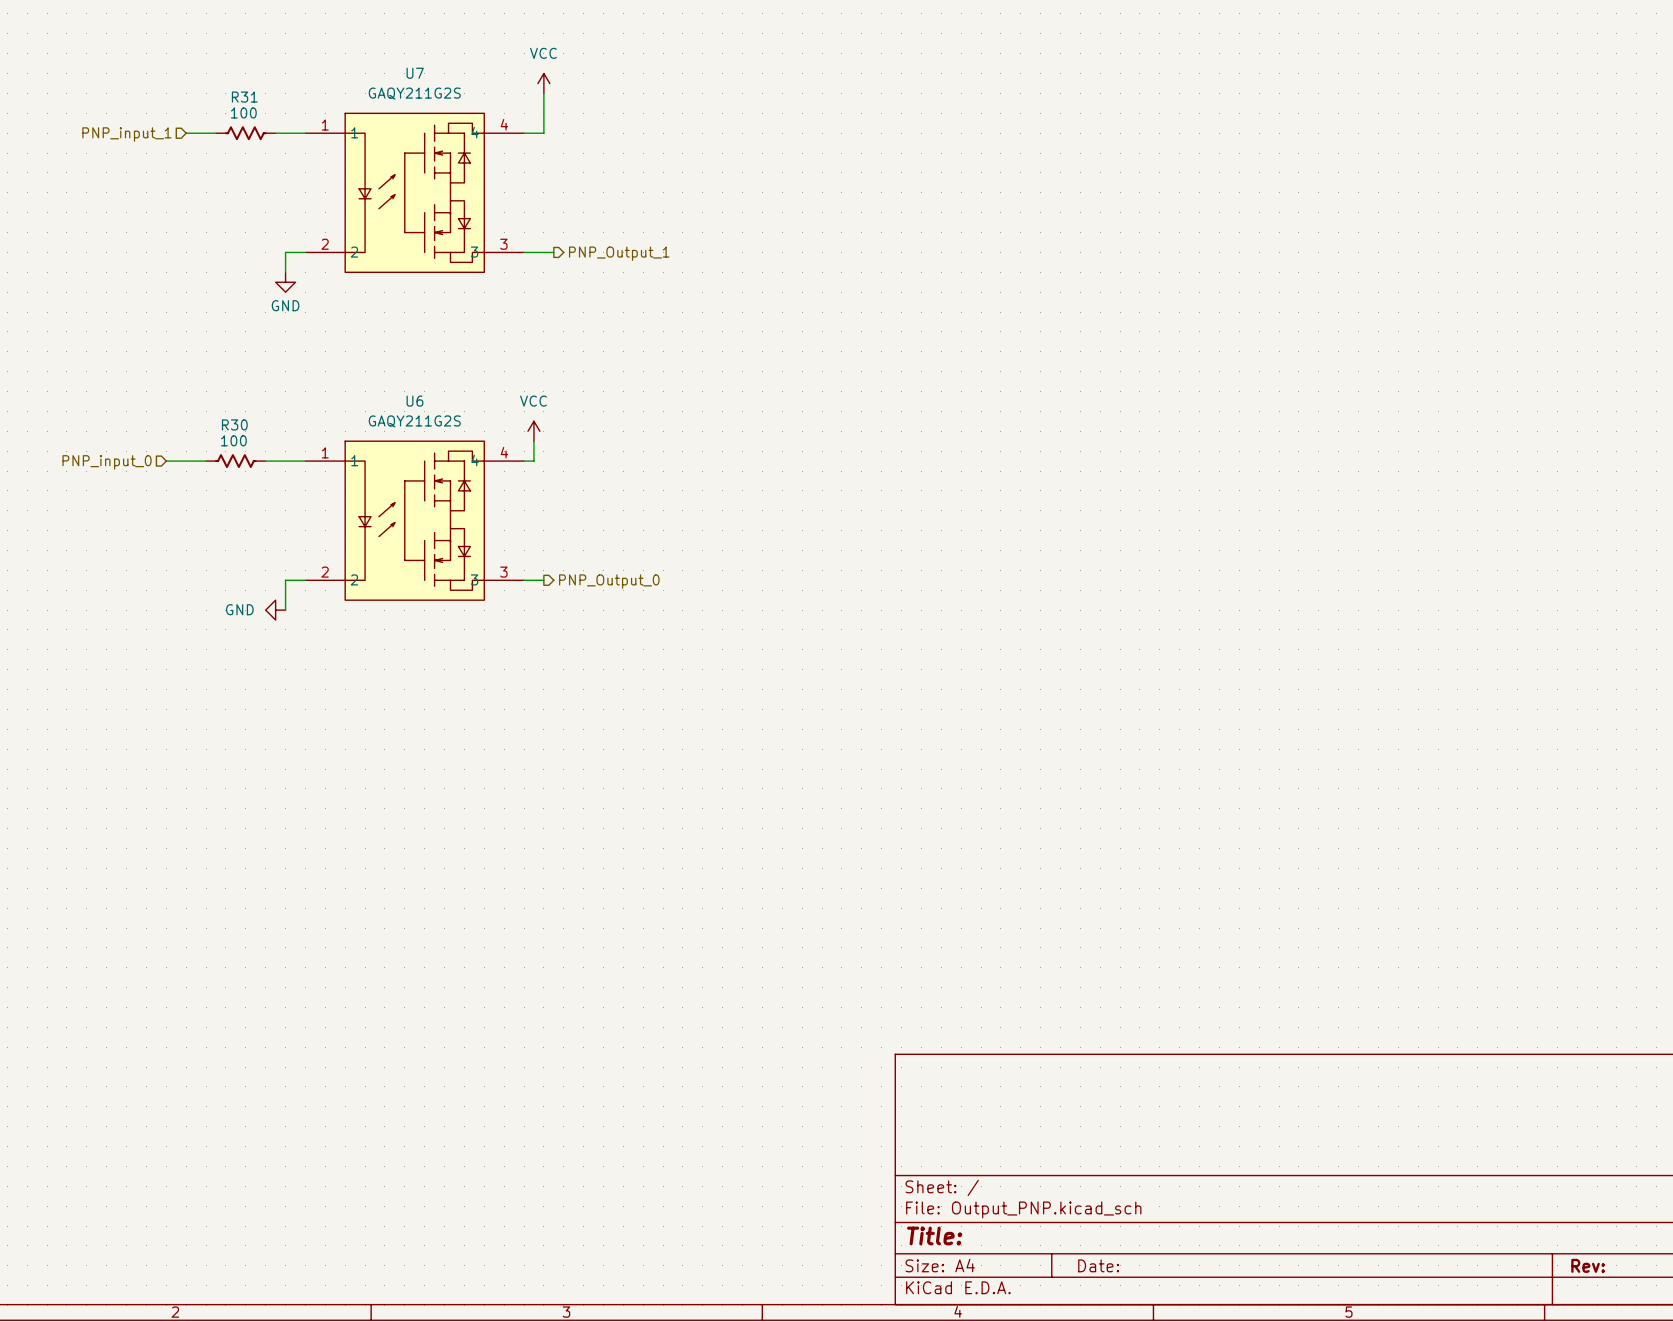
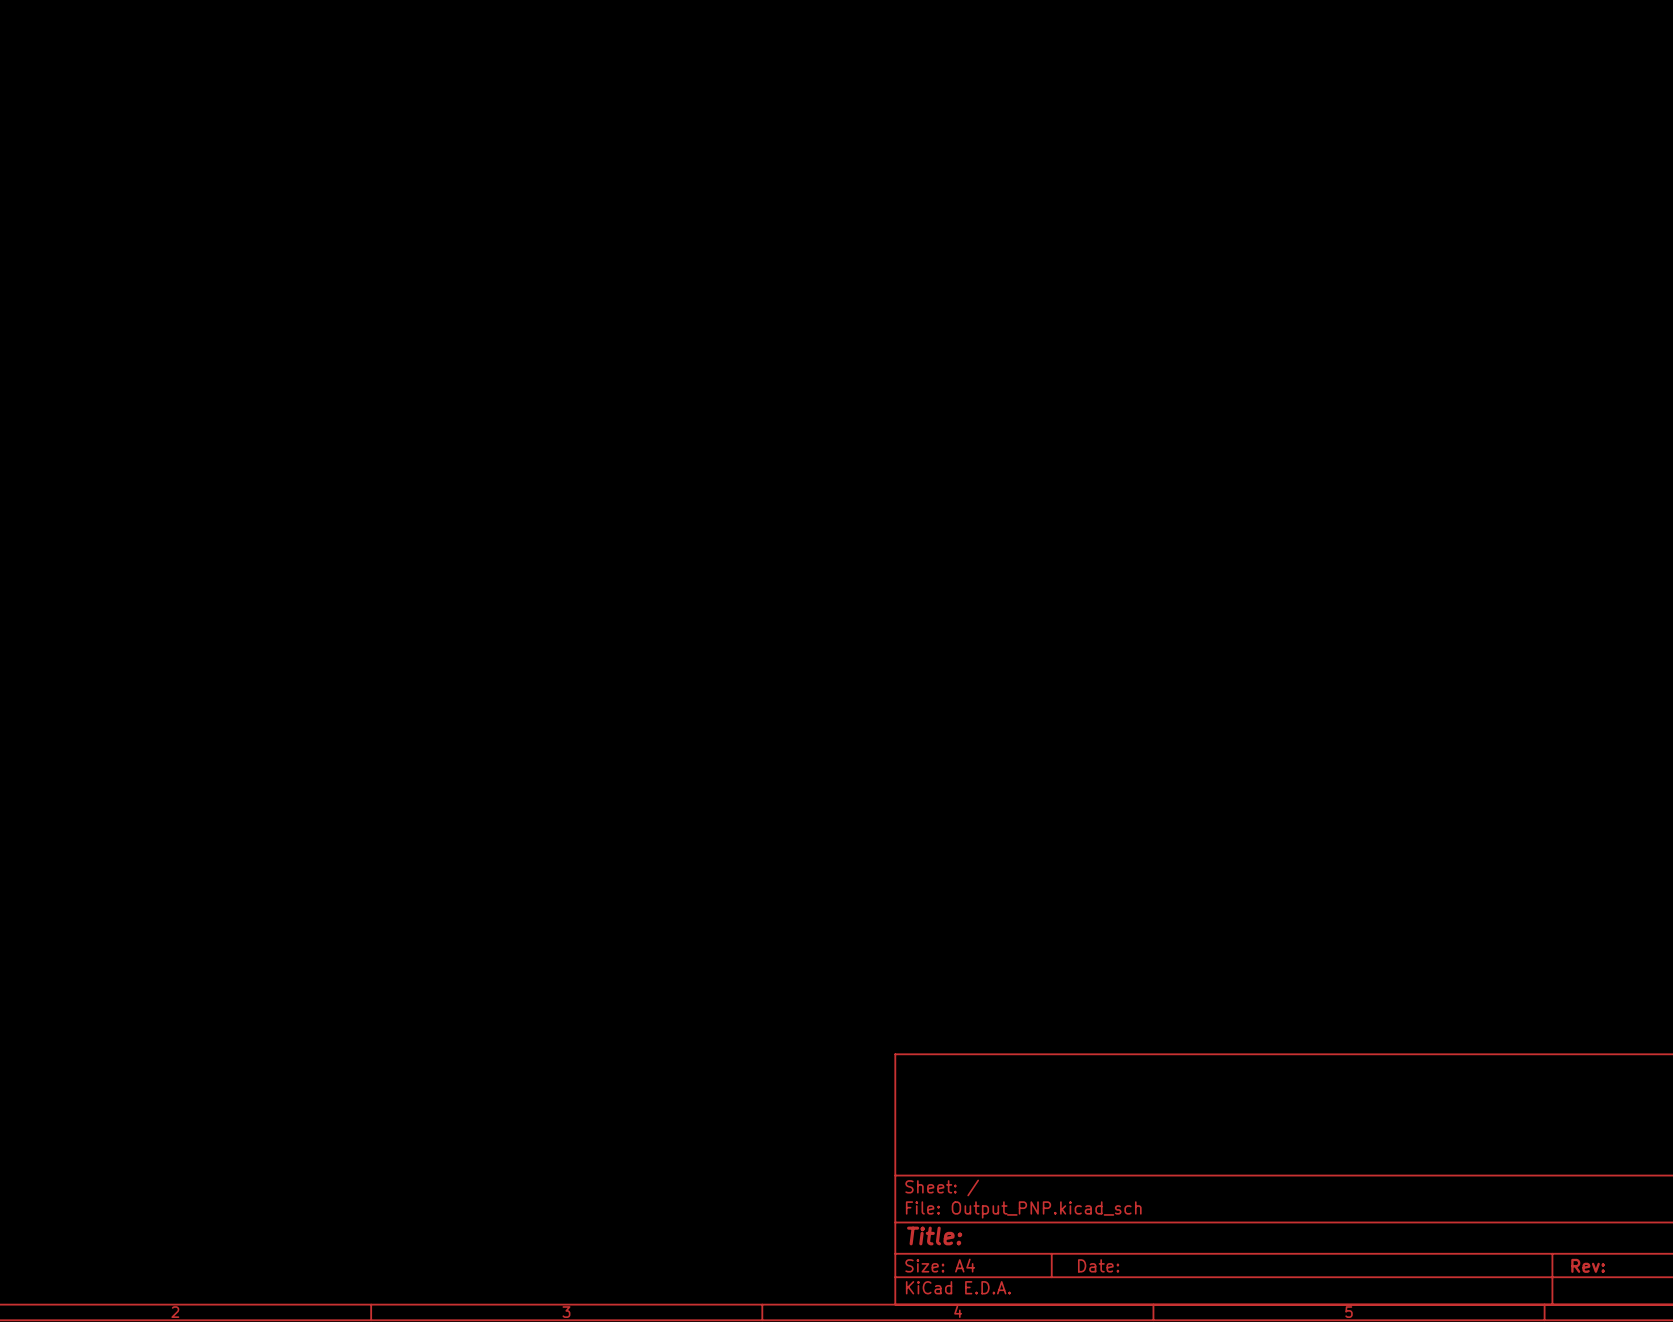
power symbol: VCC (543, 83) -> none
wire: (543, 93) (543, 133) (524, 133) -> none
wire: (186, 133) (216, 133) -> none
R31: (245, 133) -> none
wire: (275, 133) (305, 133) -> none
hierarchical label: PNP_input_1 (126, 134) -> none
U7: GAQY211G2S (414, 192) -> none
wire: (305, 252) (285, 252) (285, 272) -> none
wire: (524, 252) (553, 252) -> none
hierarchical label: PNP_Output_1 (619, 253) -> none
power symbol: GND (285, 282) -> none
power symbol: VCC (533, 431) -> none
wire: (533, 441) (533, 461) (524, 461) -> none
wire: (166, 461) (206, 461) -> none
R30: (235, 461) -> none
wire: (265, 461) (305, 461) -> none
hierarchical label: PNP_input_0 (107, 462) -> none
U6: GAQY211G2S (414, 520) -> none
wire: (305, 580) (285, 580) (285, 610) -> none
wire: (524, 580) (543, 580) -> none
hierarchical label: PNP_Output_0 (609, 581) -> none
power symbol: GND (275, 610) -> none

